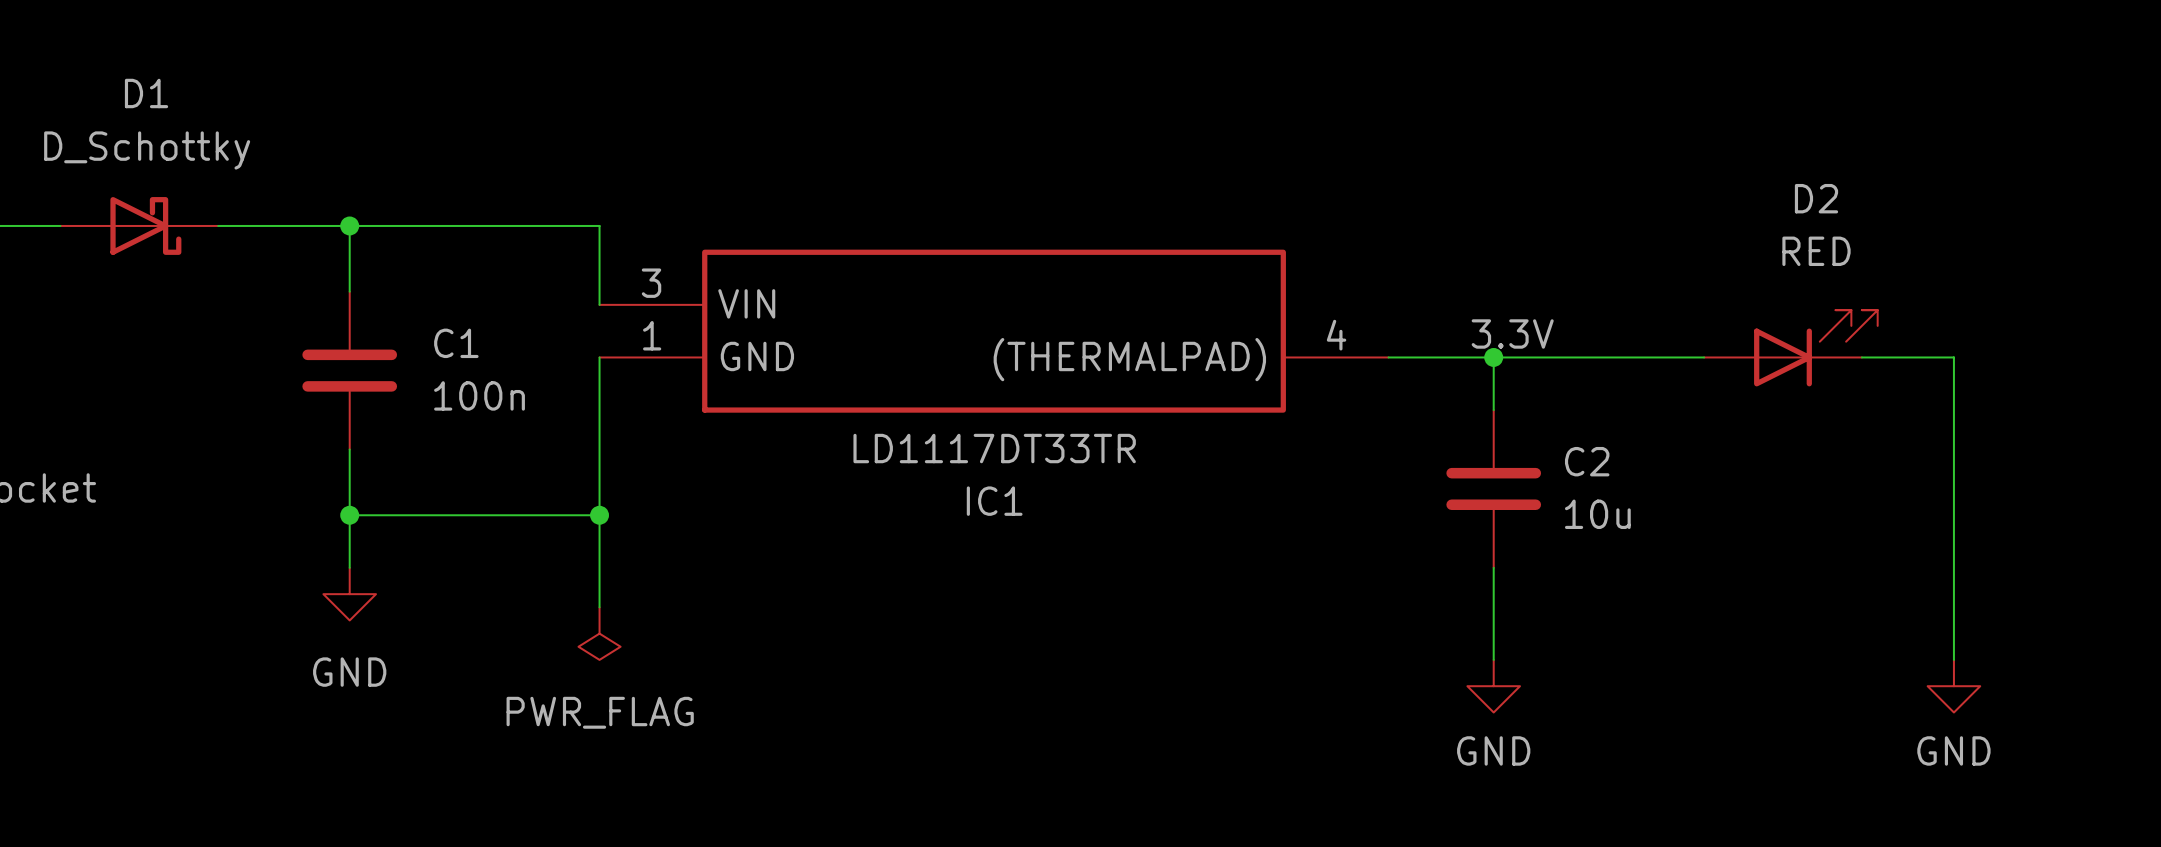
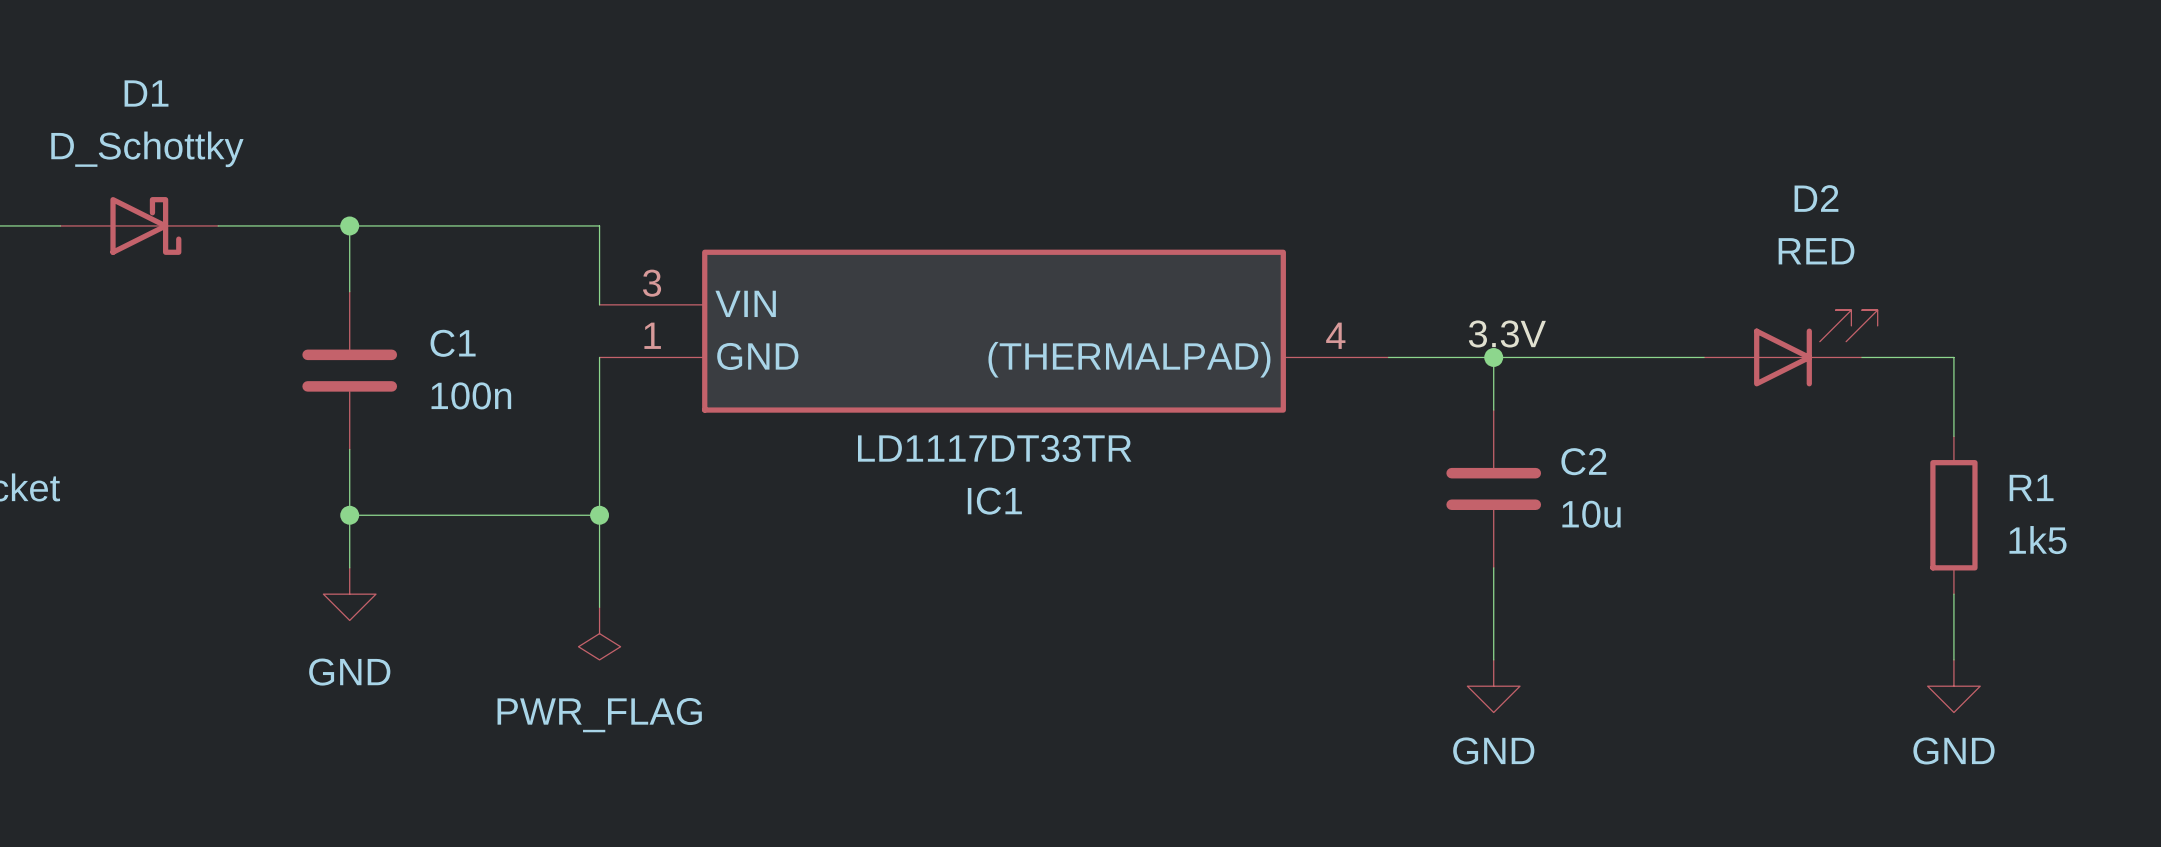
wire: (1953, 436) (1953, 594) -> none
R1: none -> 1k5 (1953, 515)

